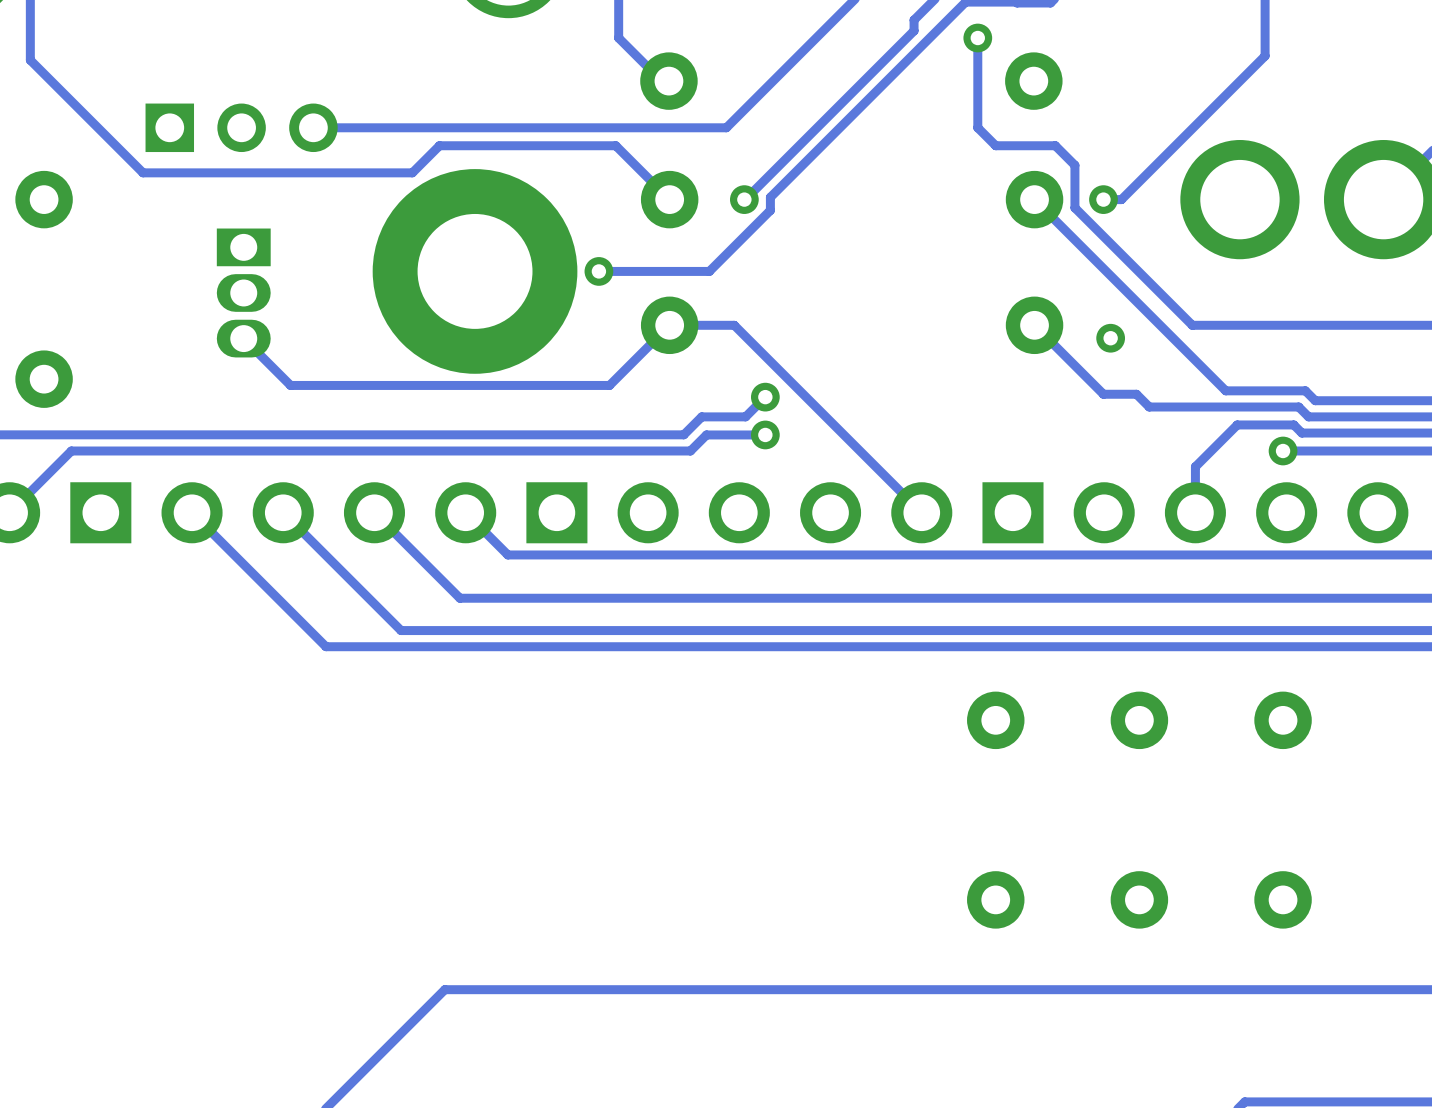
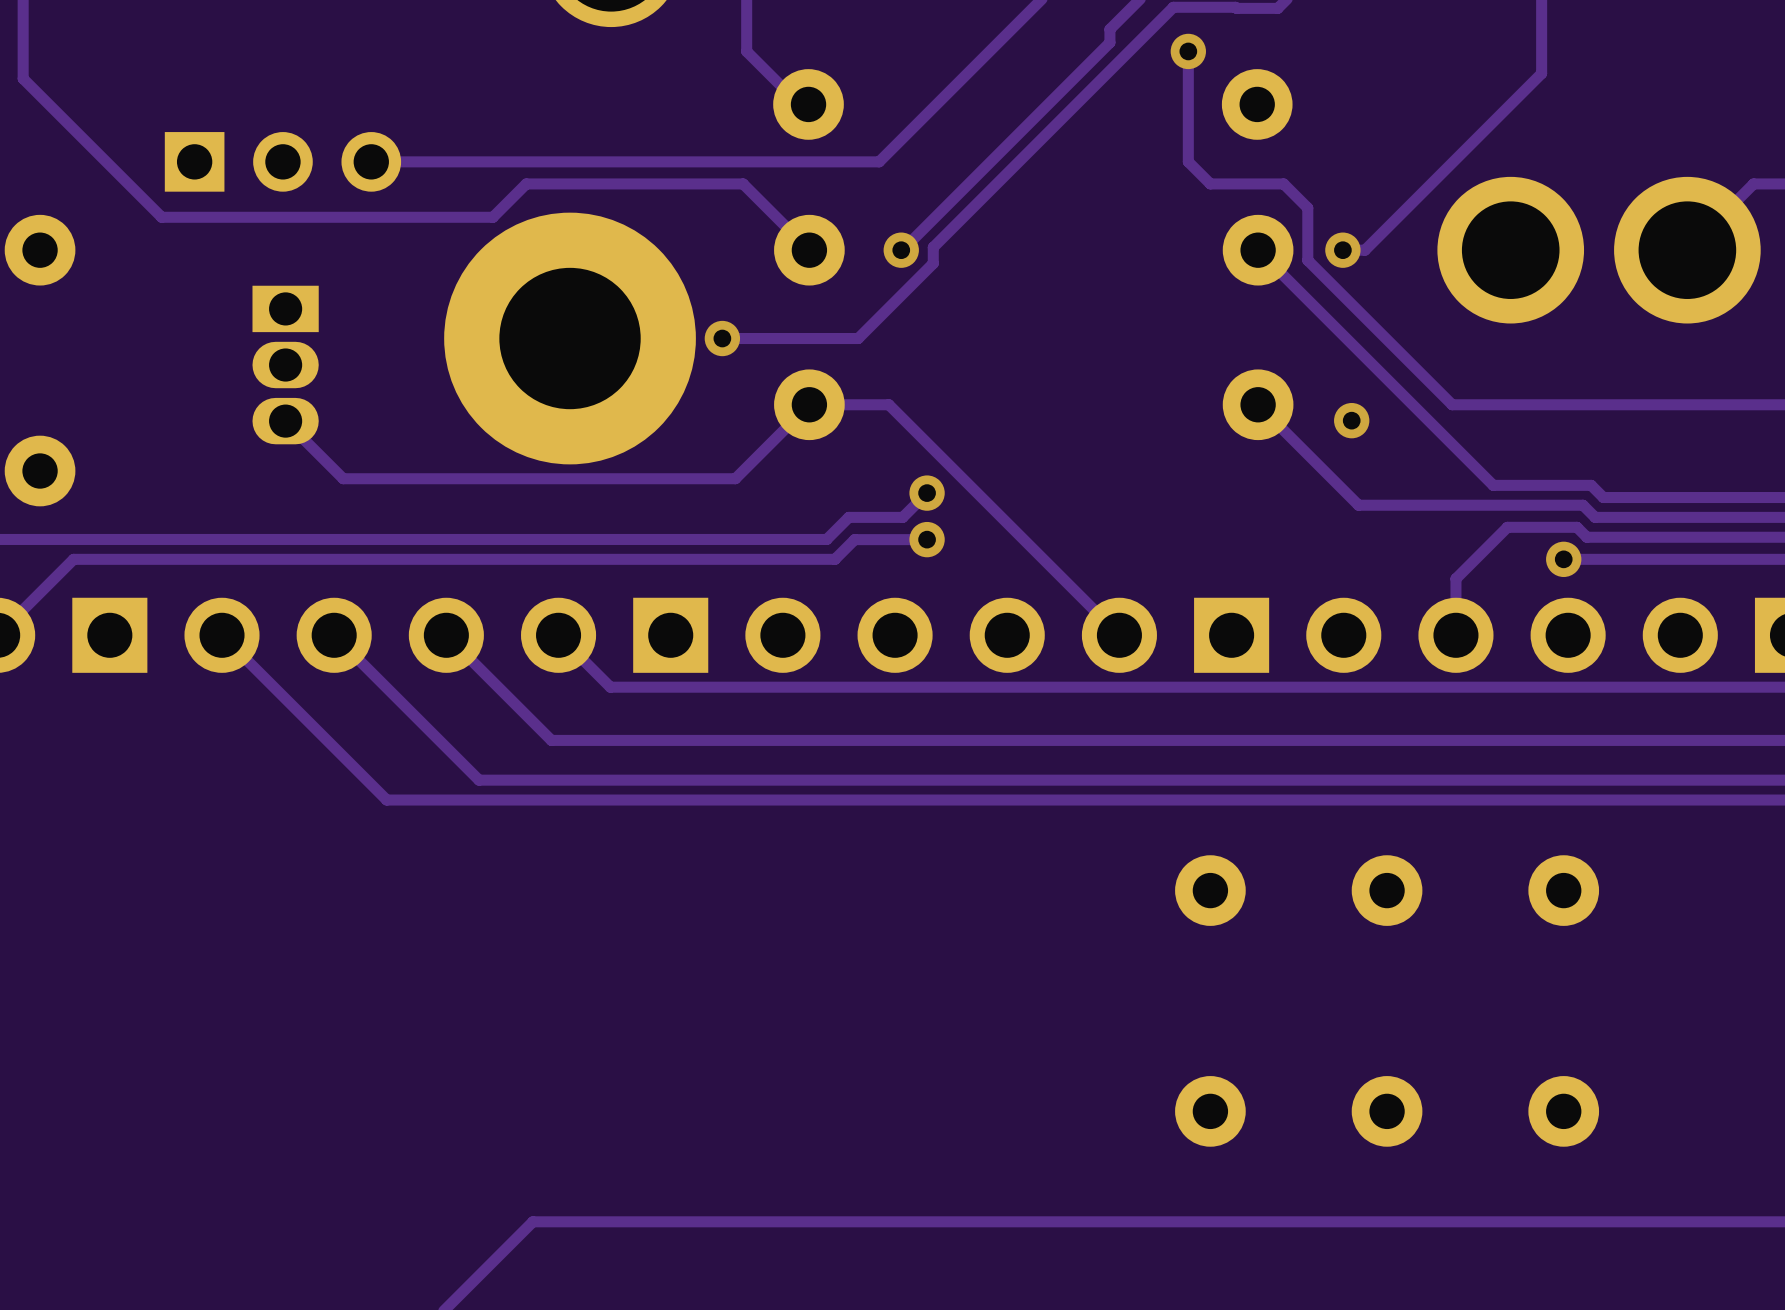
track: (1103, 394) (1136, 394) (1149, 407) -> (1342, 489) (1358, 505) (1399, 505)

